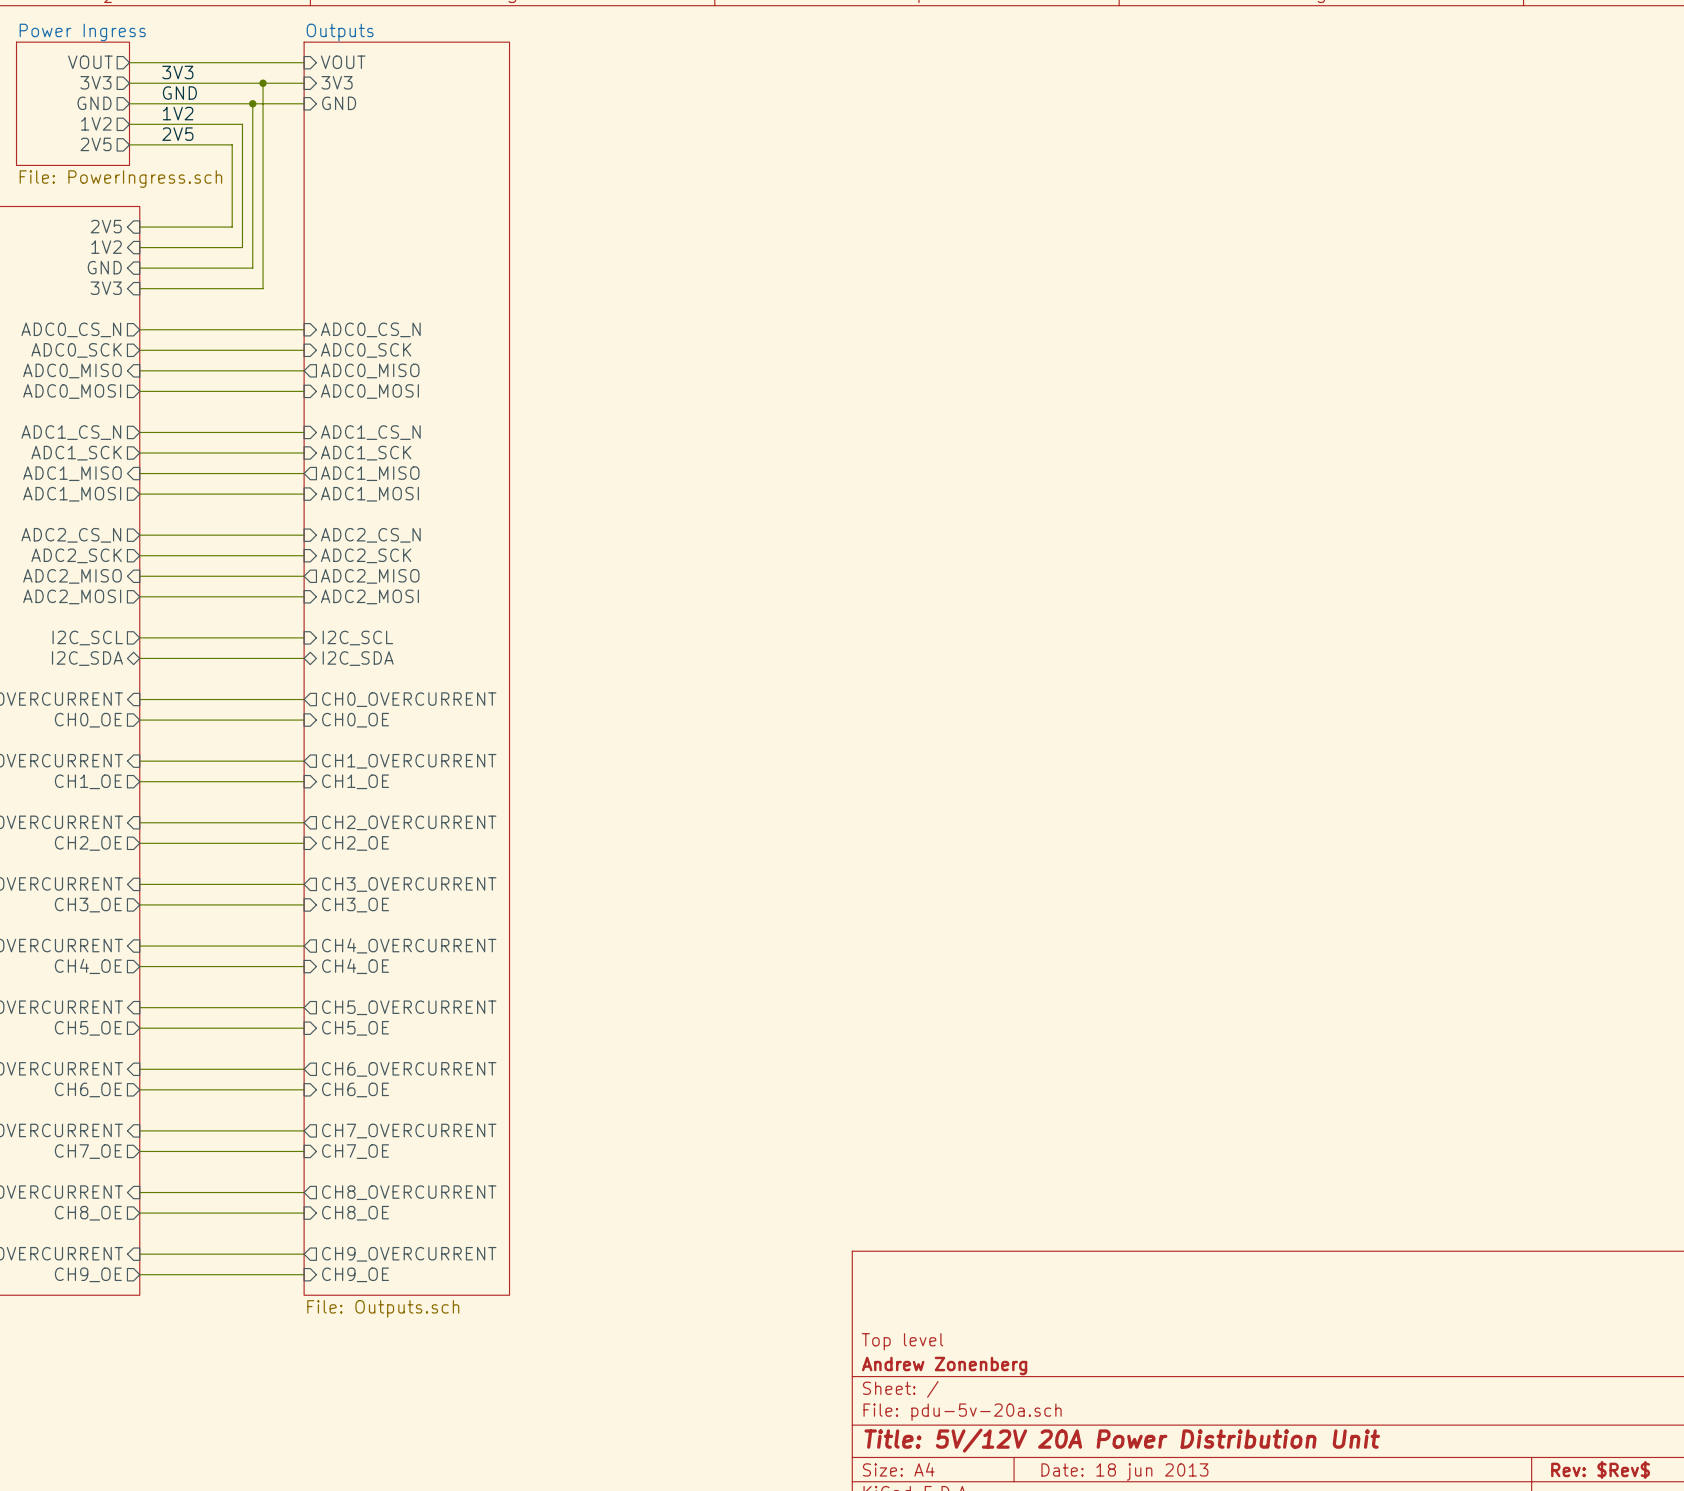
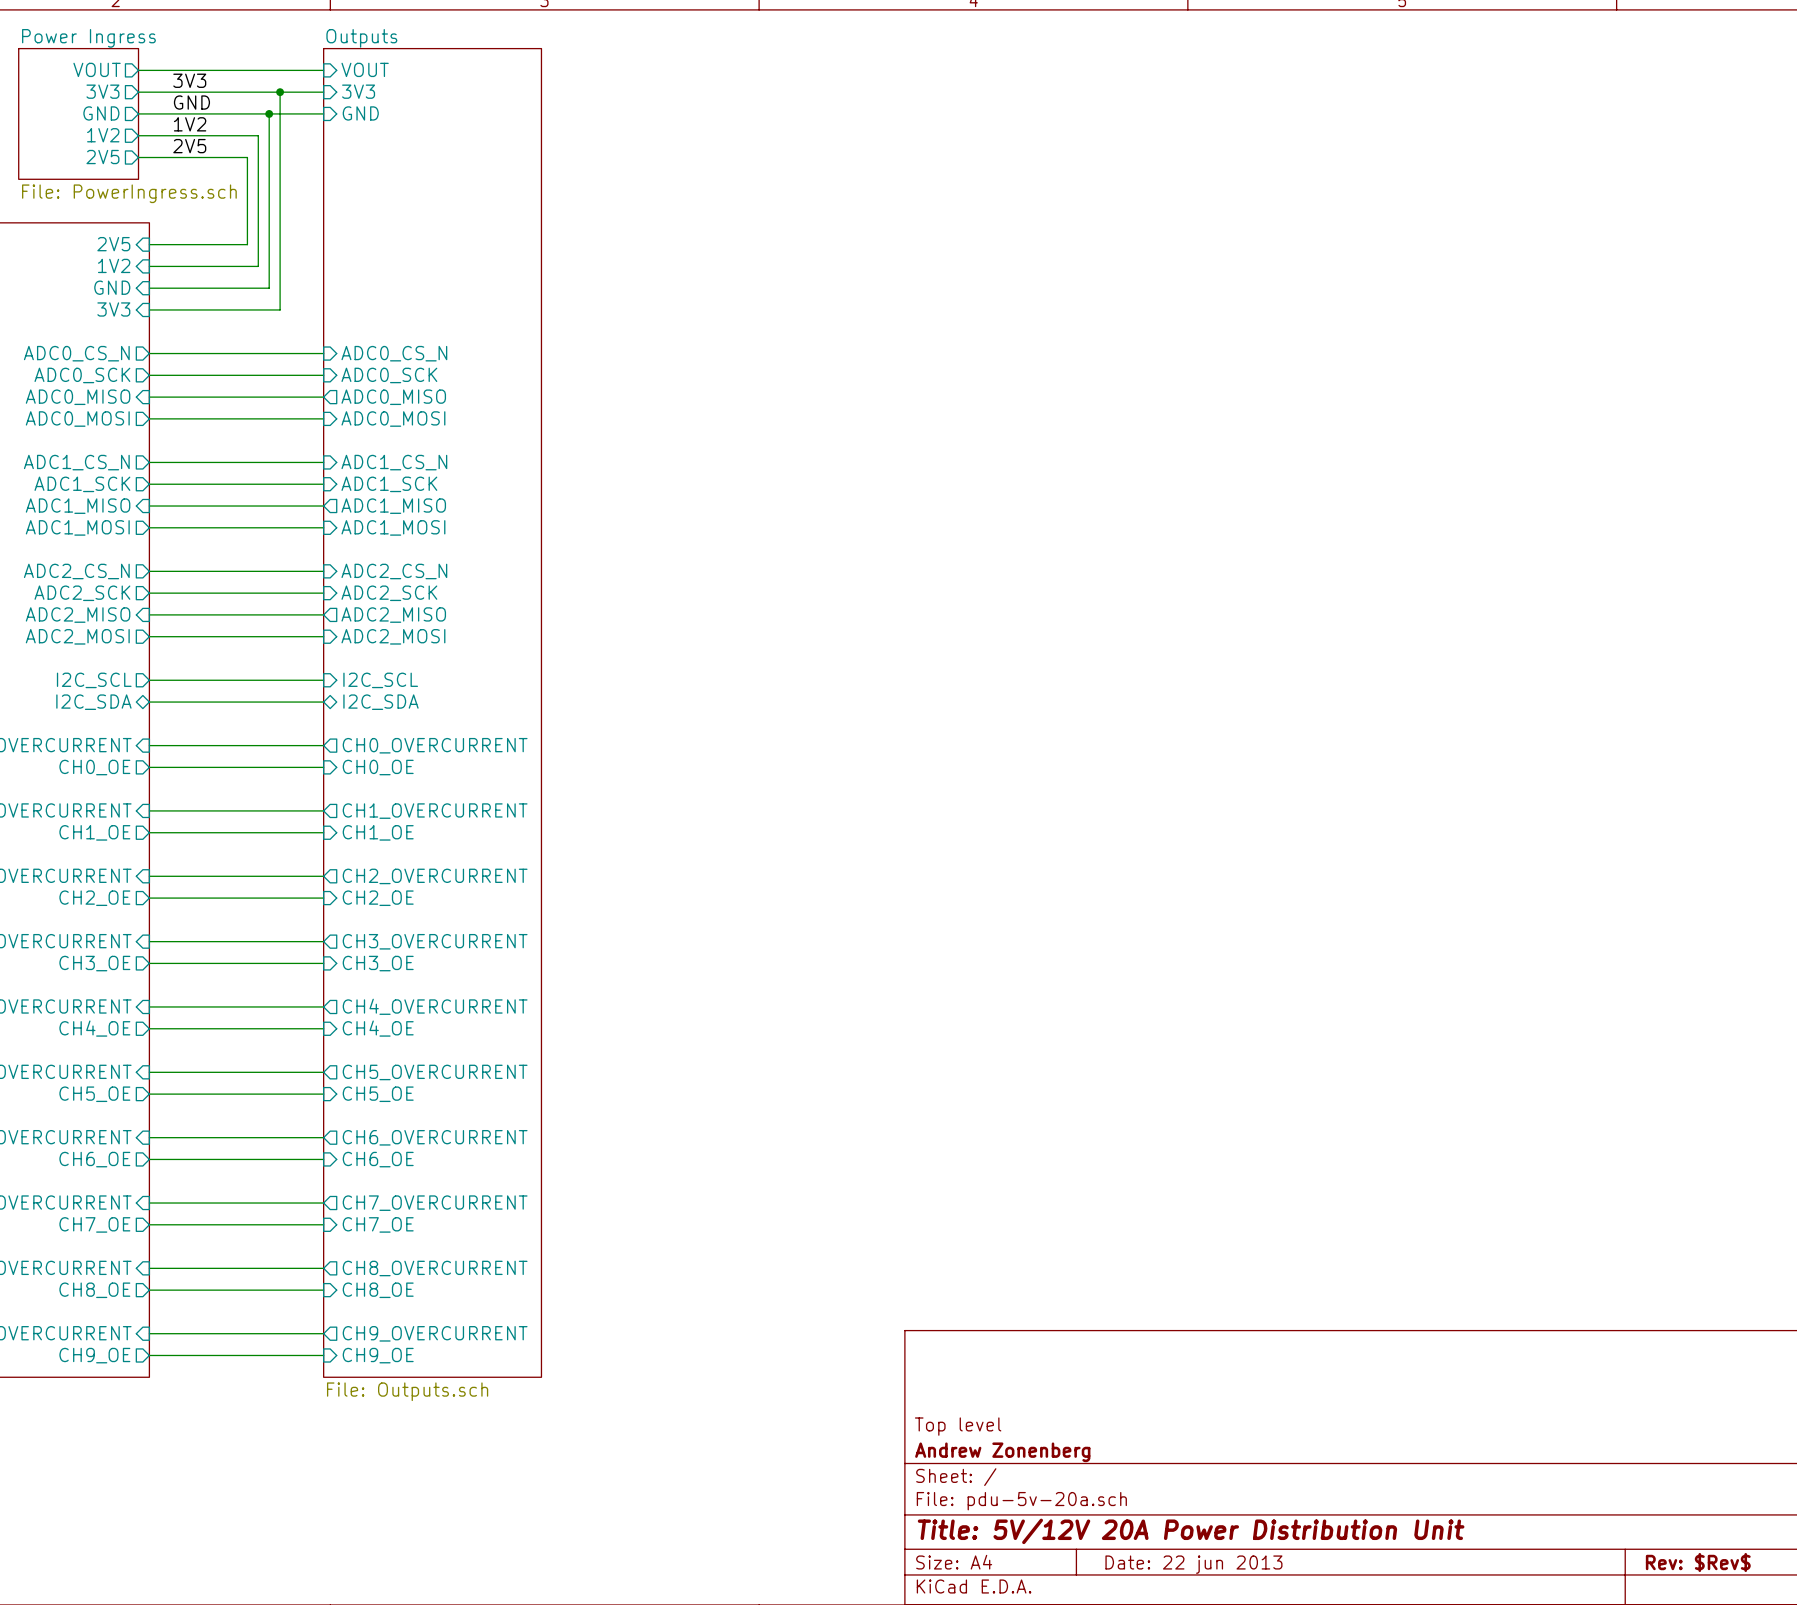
title block: Date: 18 jun 2013 (1124, 1471) -> Date: 22 jun 2013 (1193, 1564)

